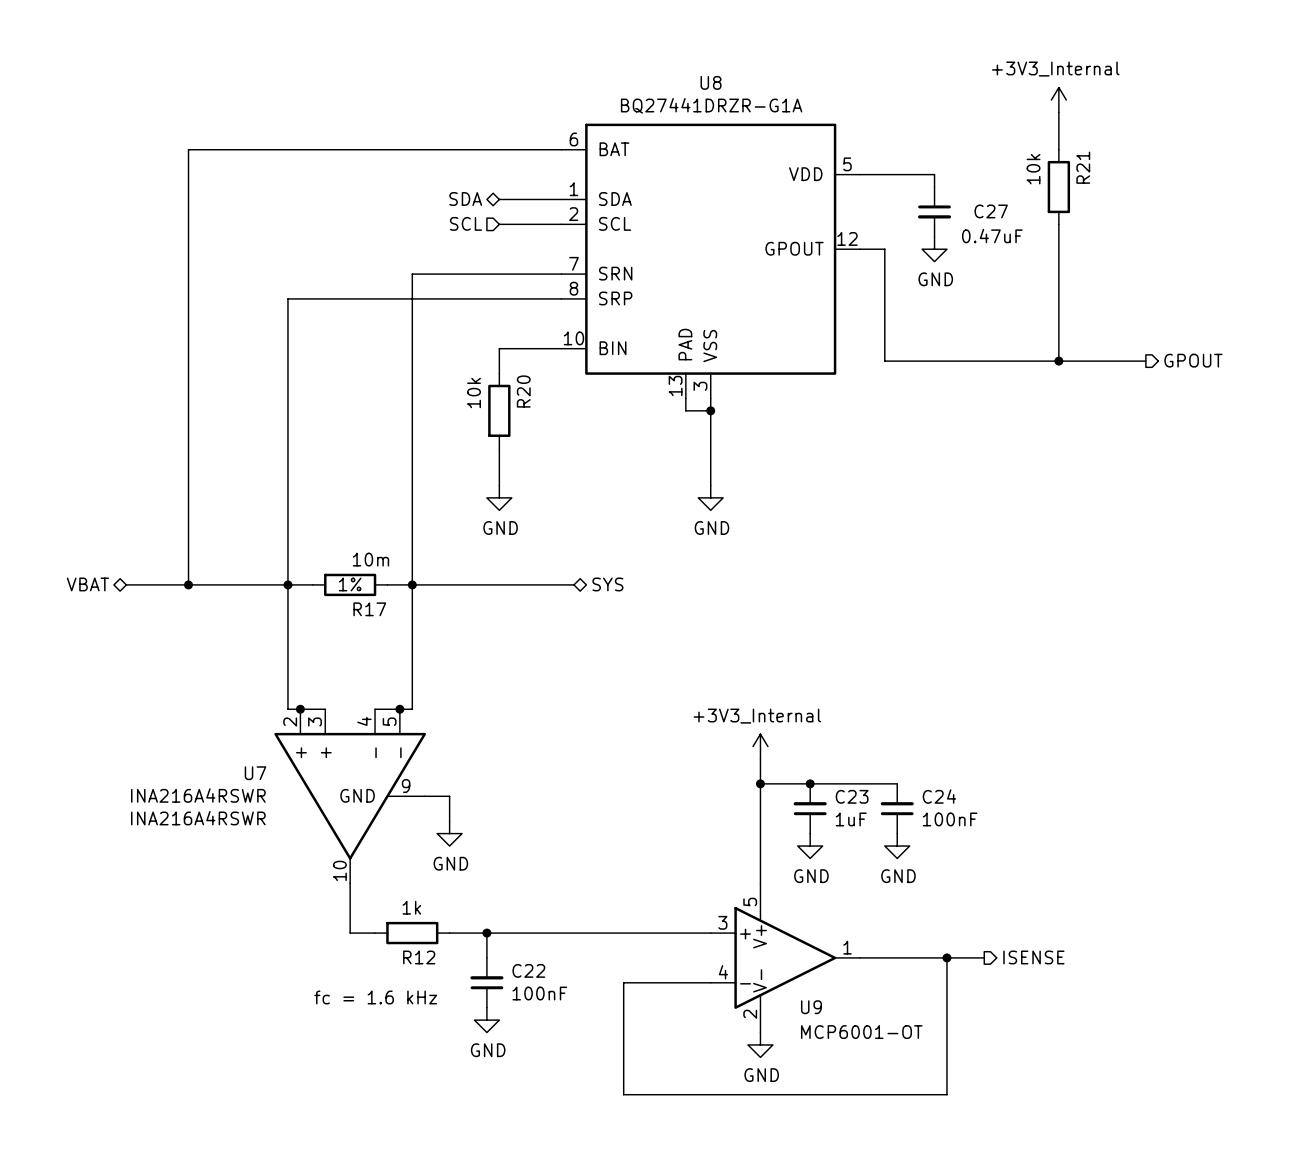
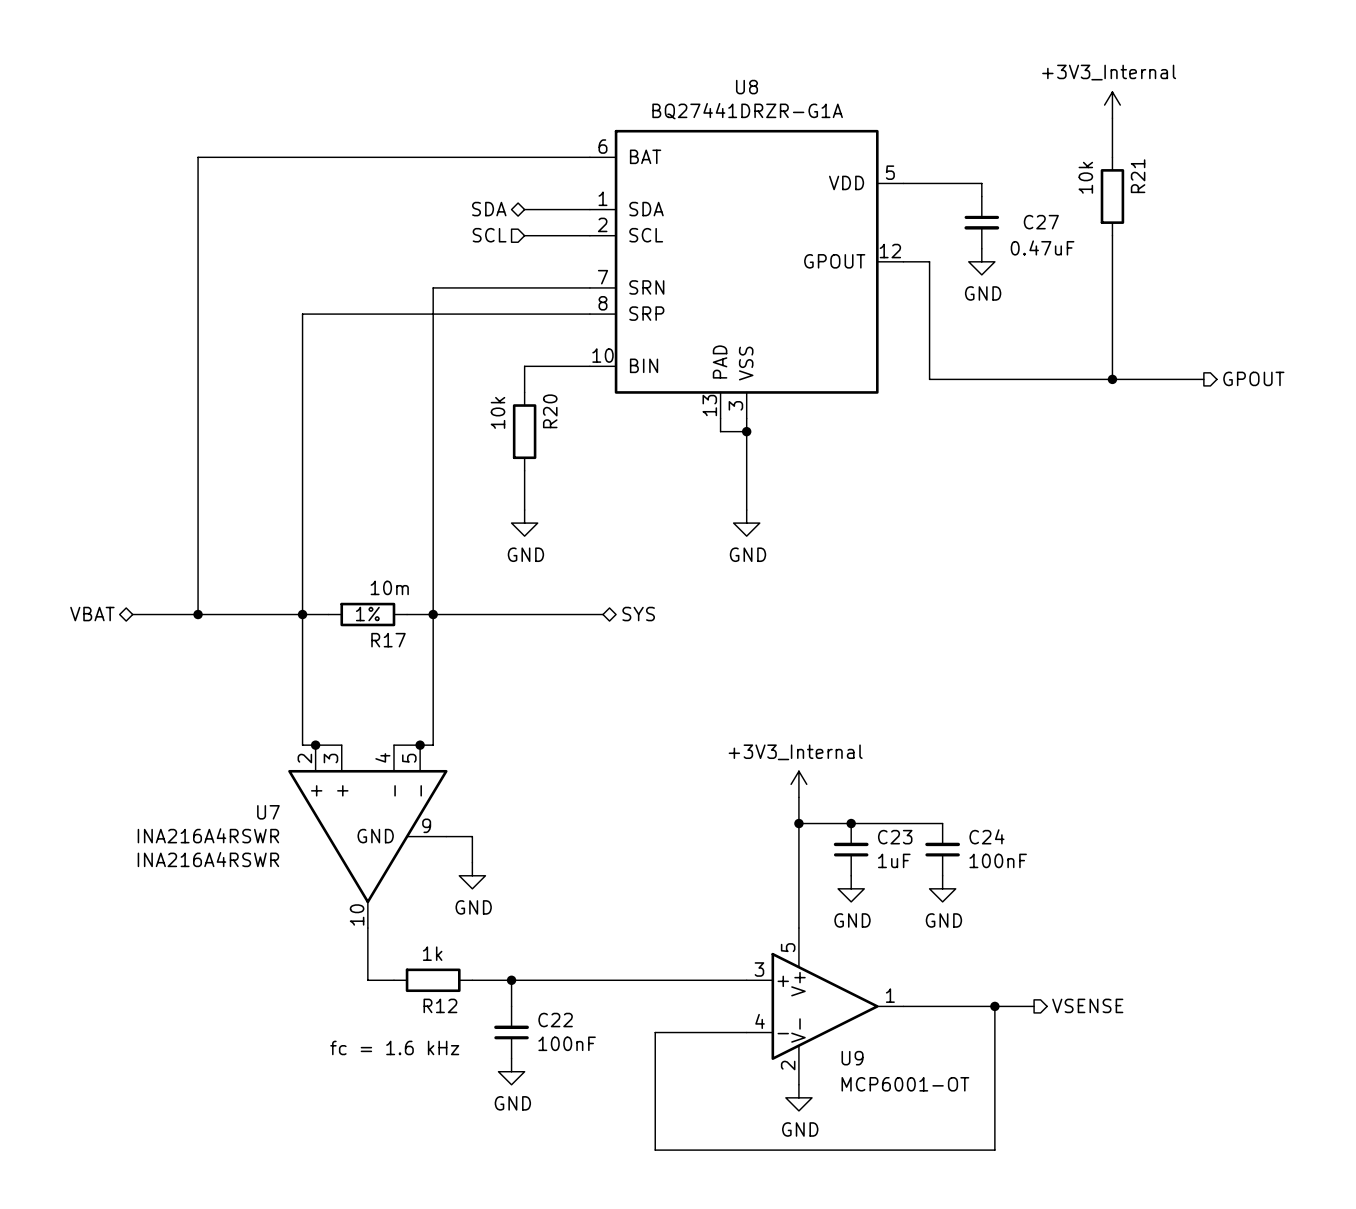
hierarchical label: ISENSE (1033, 957) -> VSENSE (1087, 1005)

